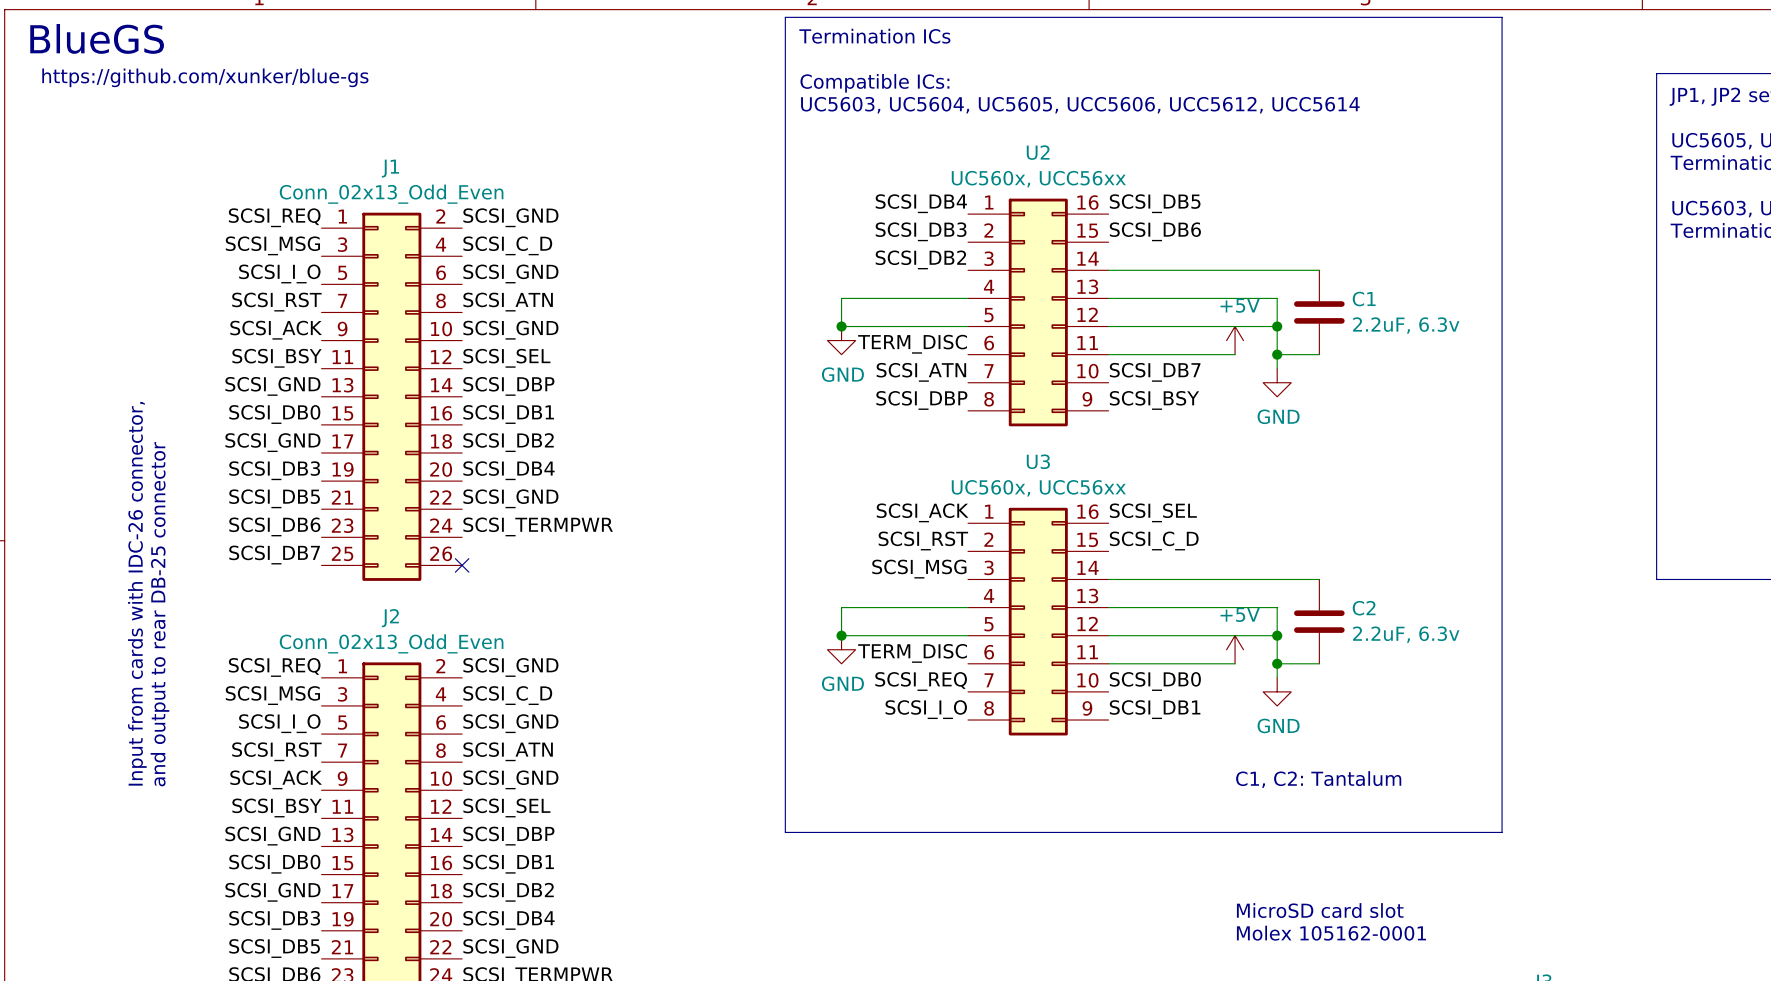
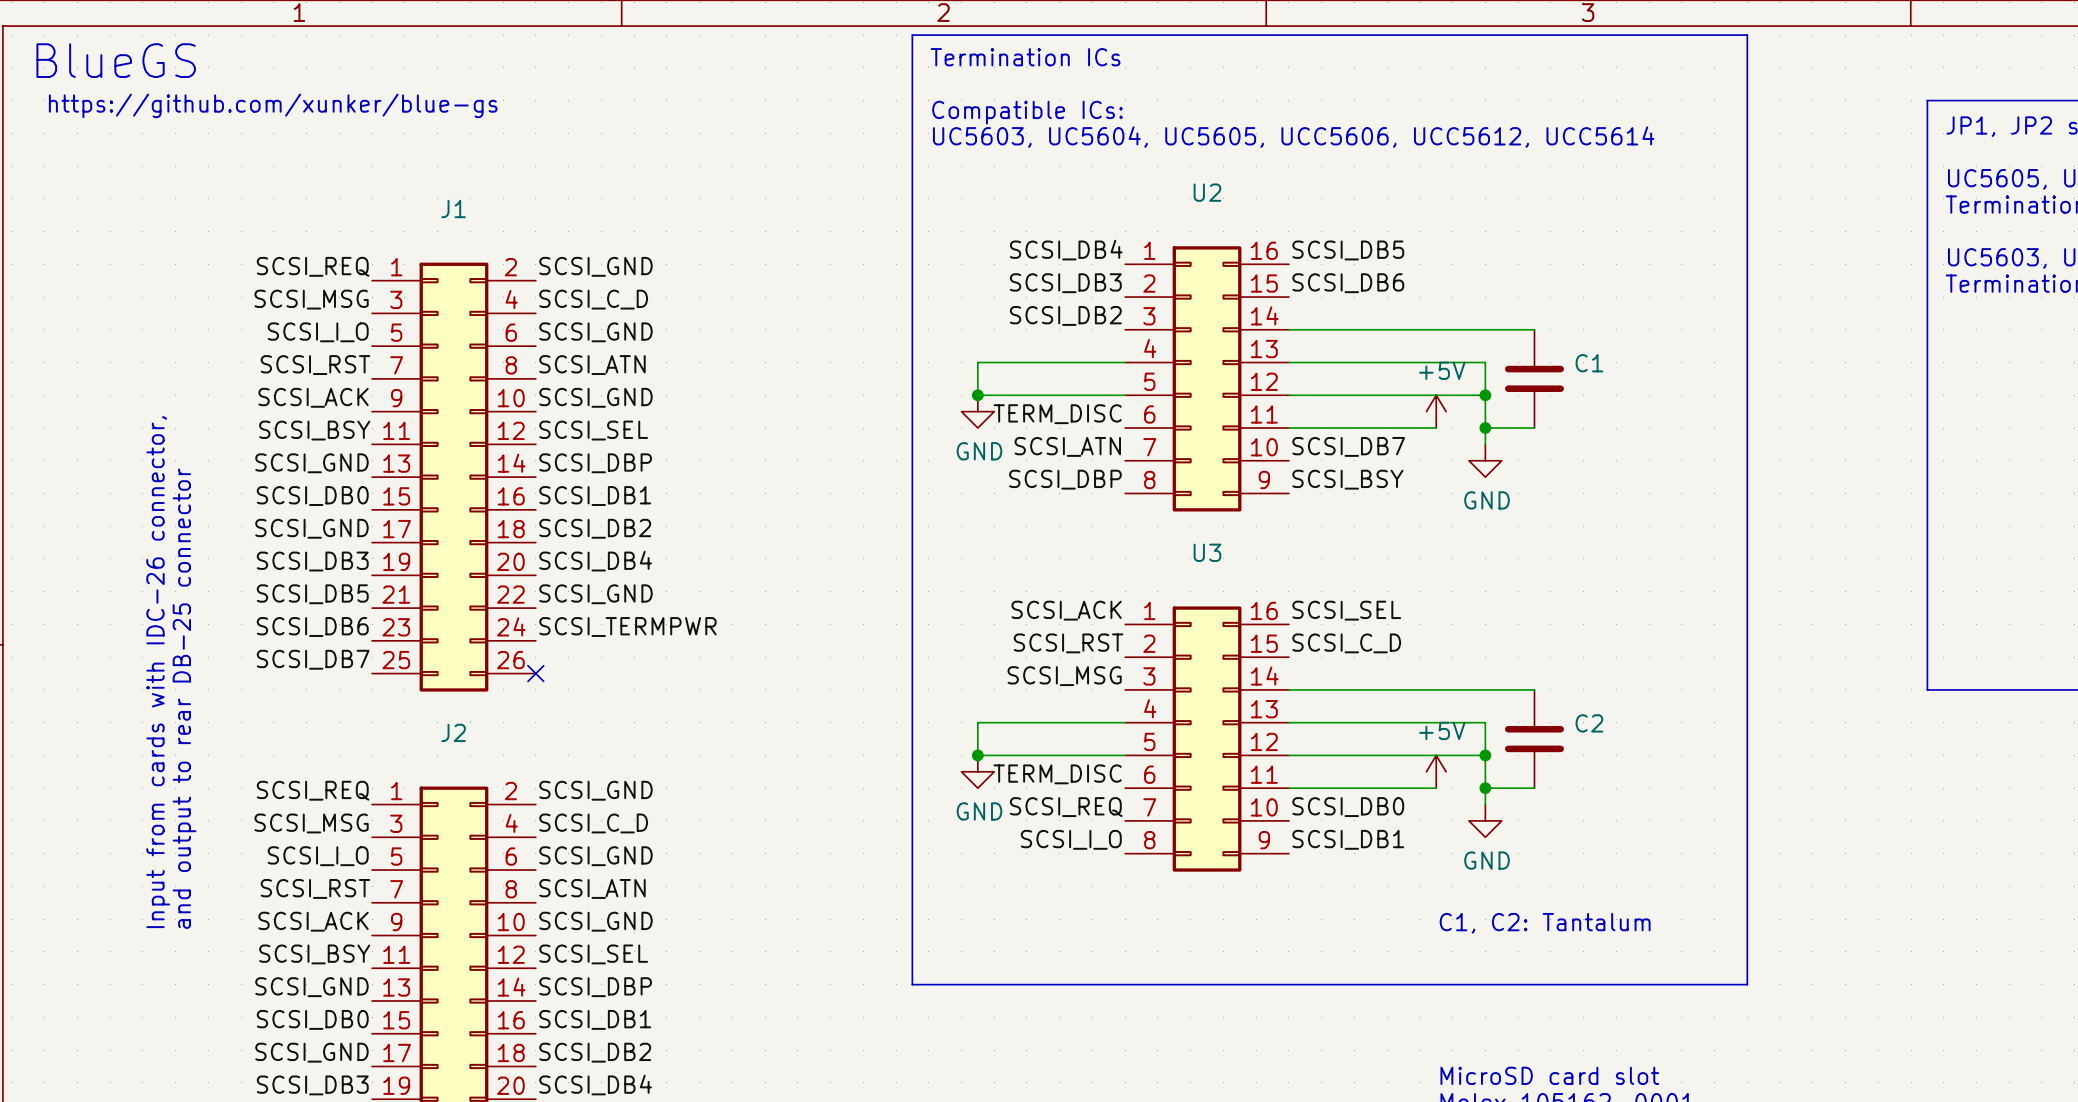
U2 value: UC560x, UCC56xx (1038, 179) -> none
J1 value: Conn_02x13_Odd_Even (391, 194) -> none
C1 value: 2.2uF, 6.3v (1406, 325) -> none
U3 value: UC560x, UCC56xx (1038, 488) -> none
C2 value: 2.2uF, 6.3v (1406, 634) -> none
J2 value: Conn_02x13_Odd_Even (391, 643) -> none

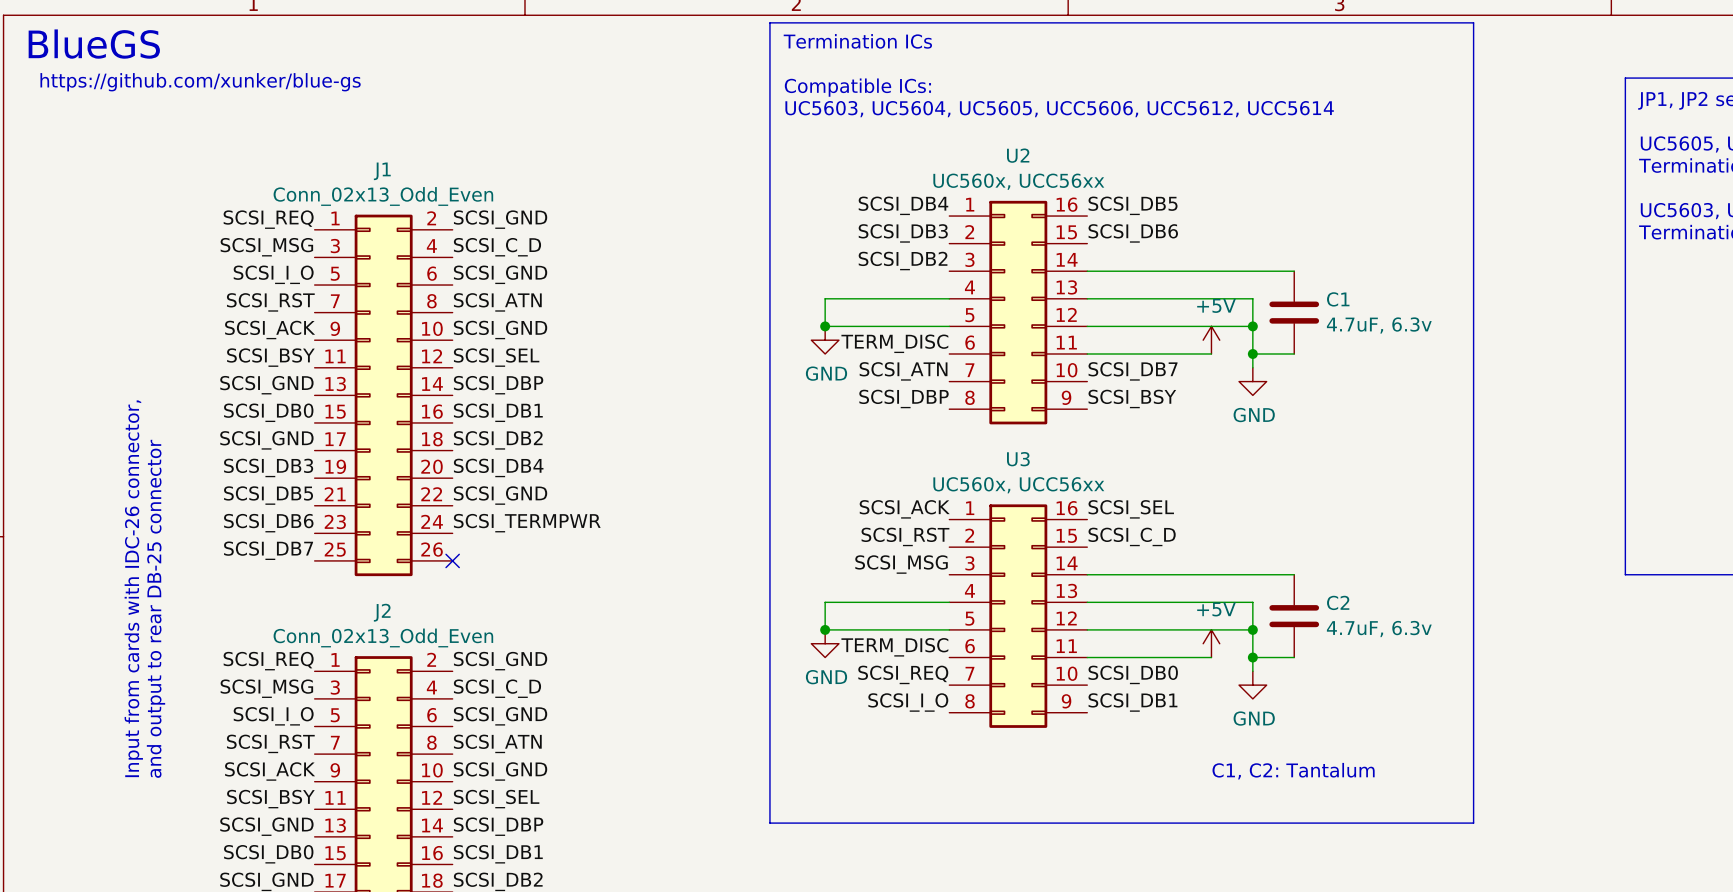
U2 value: none -> UC560x, UCC56xx (1018, 181)
J1 value: none -> Conn_02x13_Odd_Even (383, 196)
C1 value: none -> 4.7uF, 6.3v (1379, 325)
U3 value: none -> UC560x, UCC56xx (1018, 485)
C2 value: none -> 4.7uF, 6.3v (1379, 629)
J2 value: none -> Conn_02x13_Odd_Even (383, 637)

